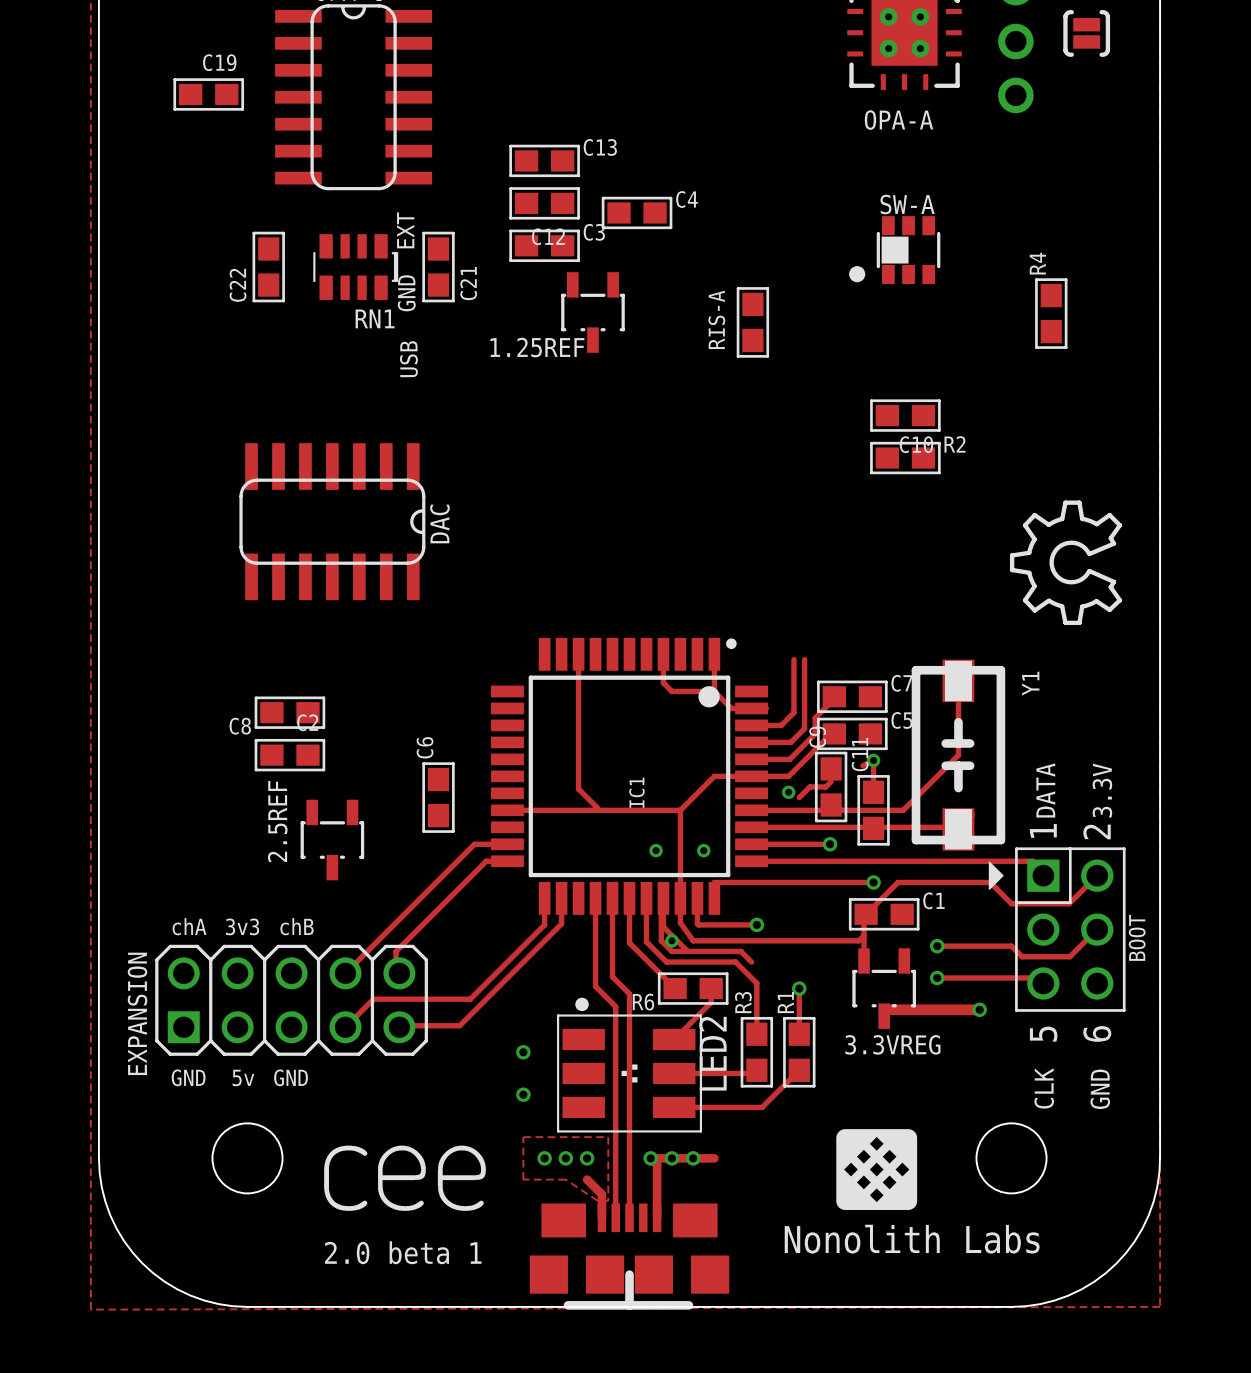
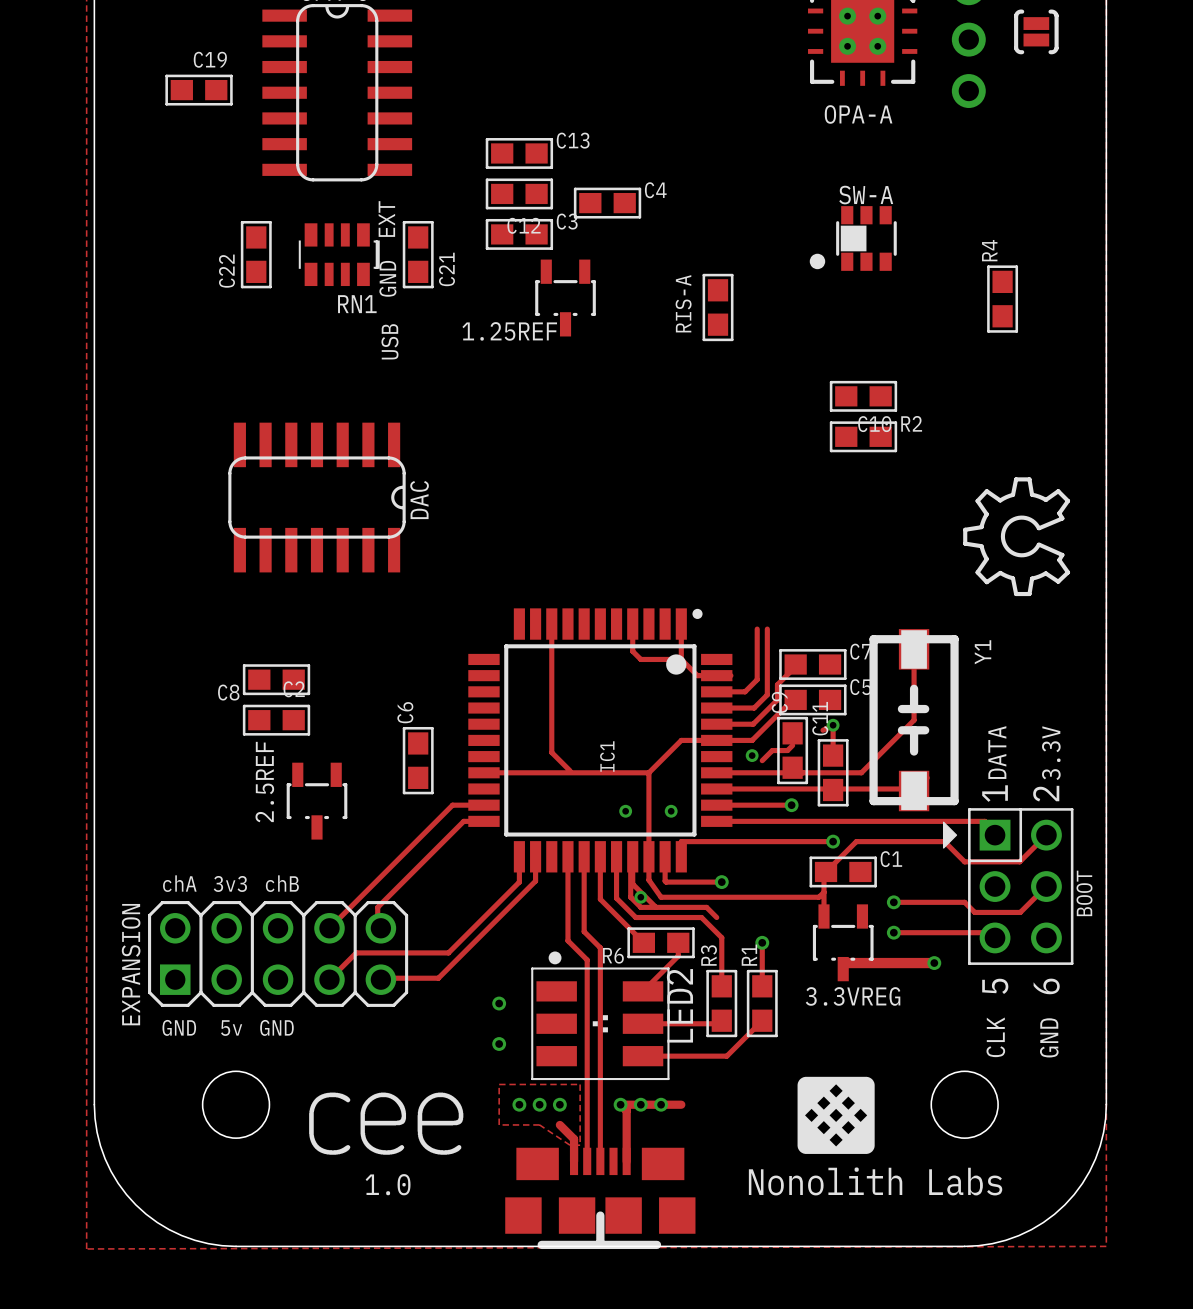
text: none -> 1.0 (388, 1184)
text: 2.0 beta 1 (403, 1252) -> none

